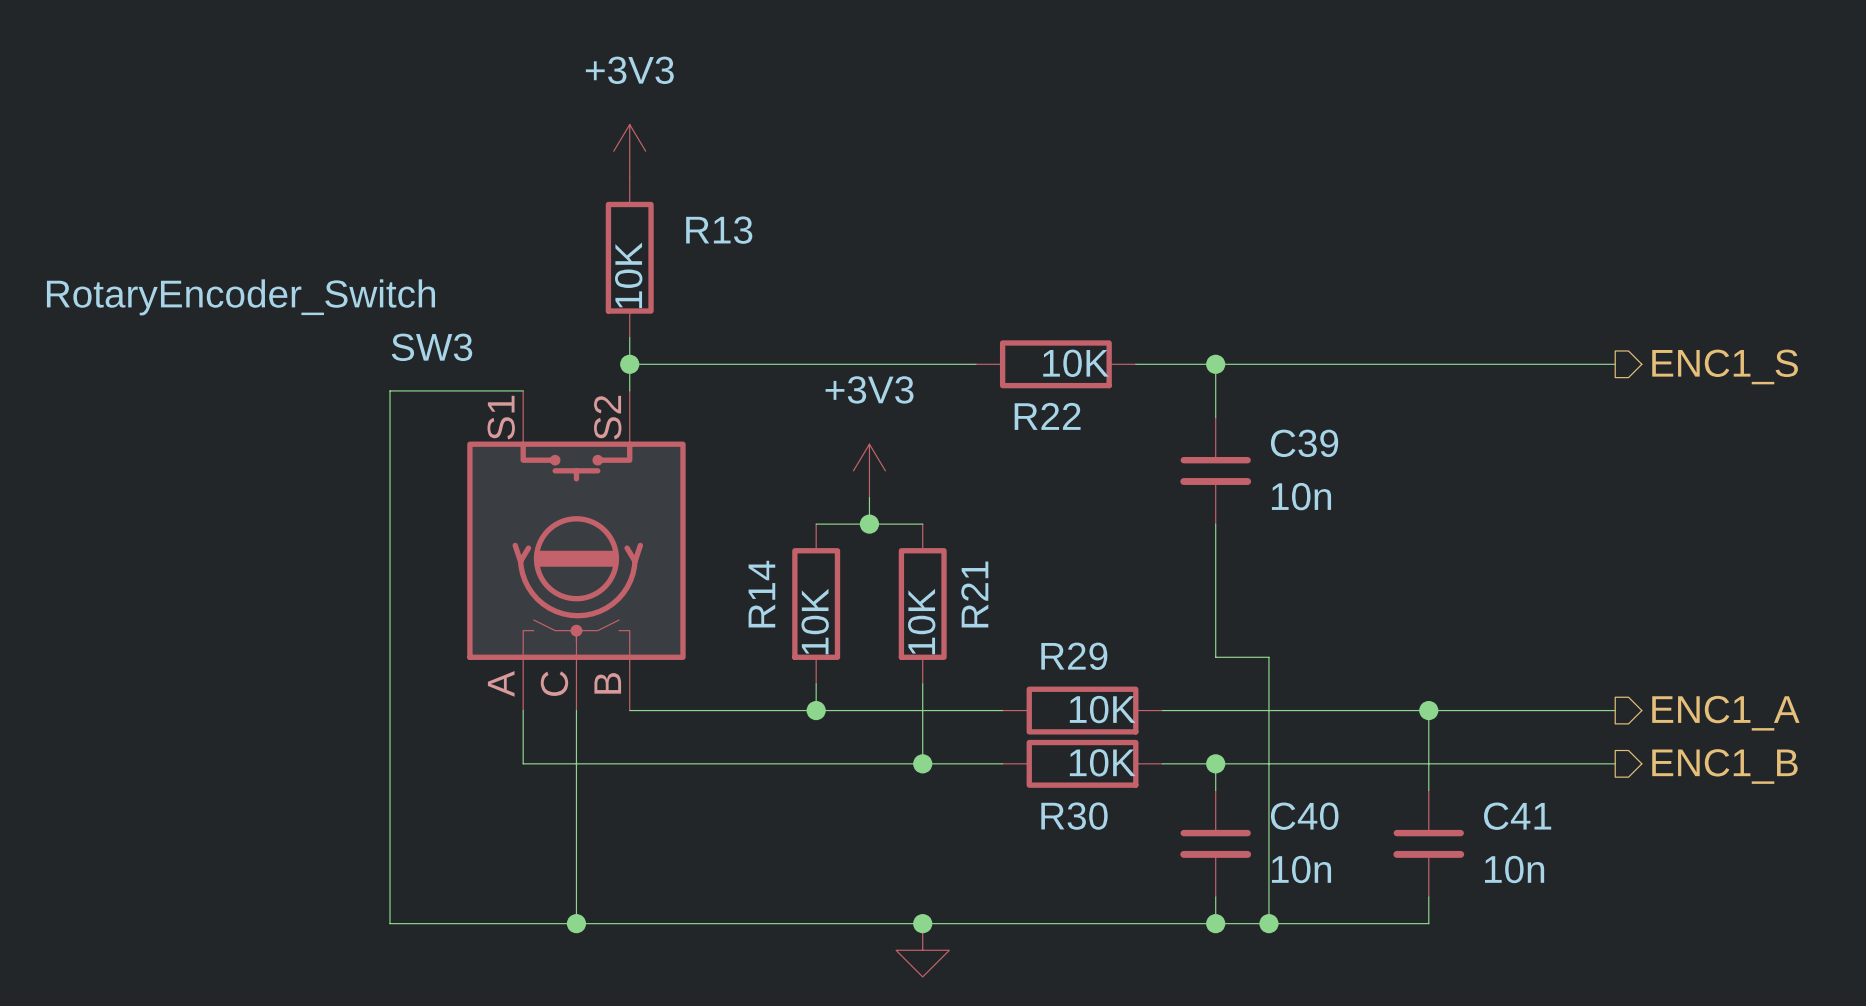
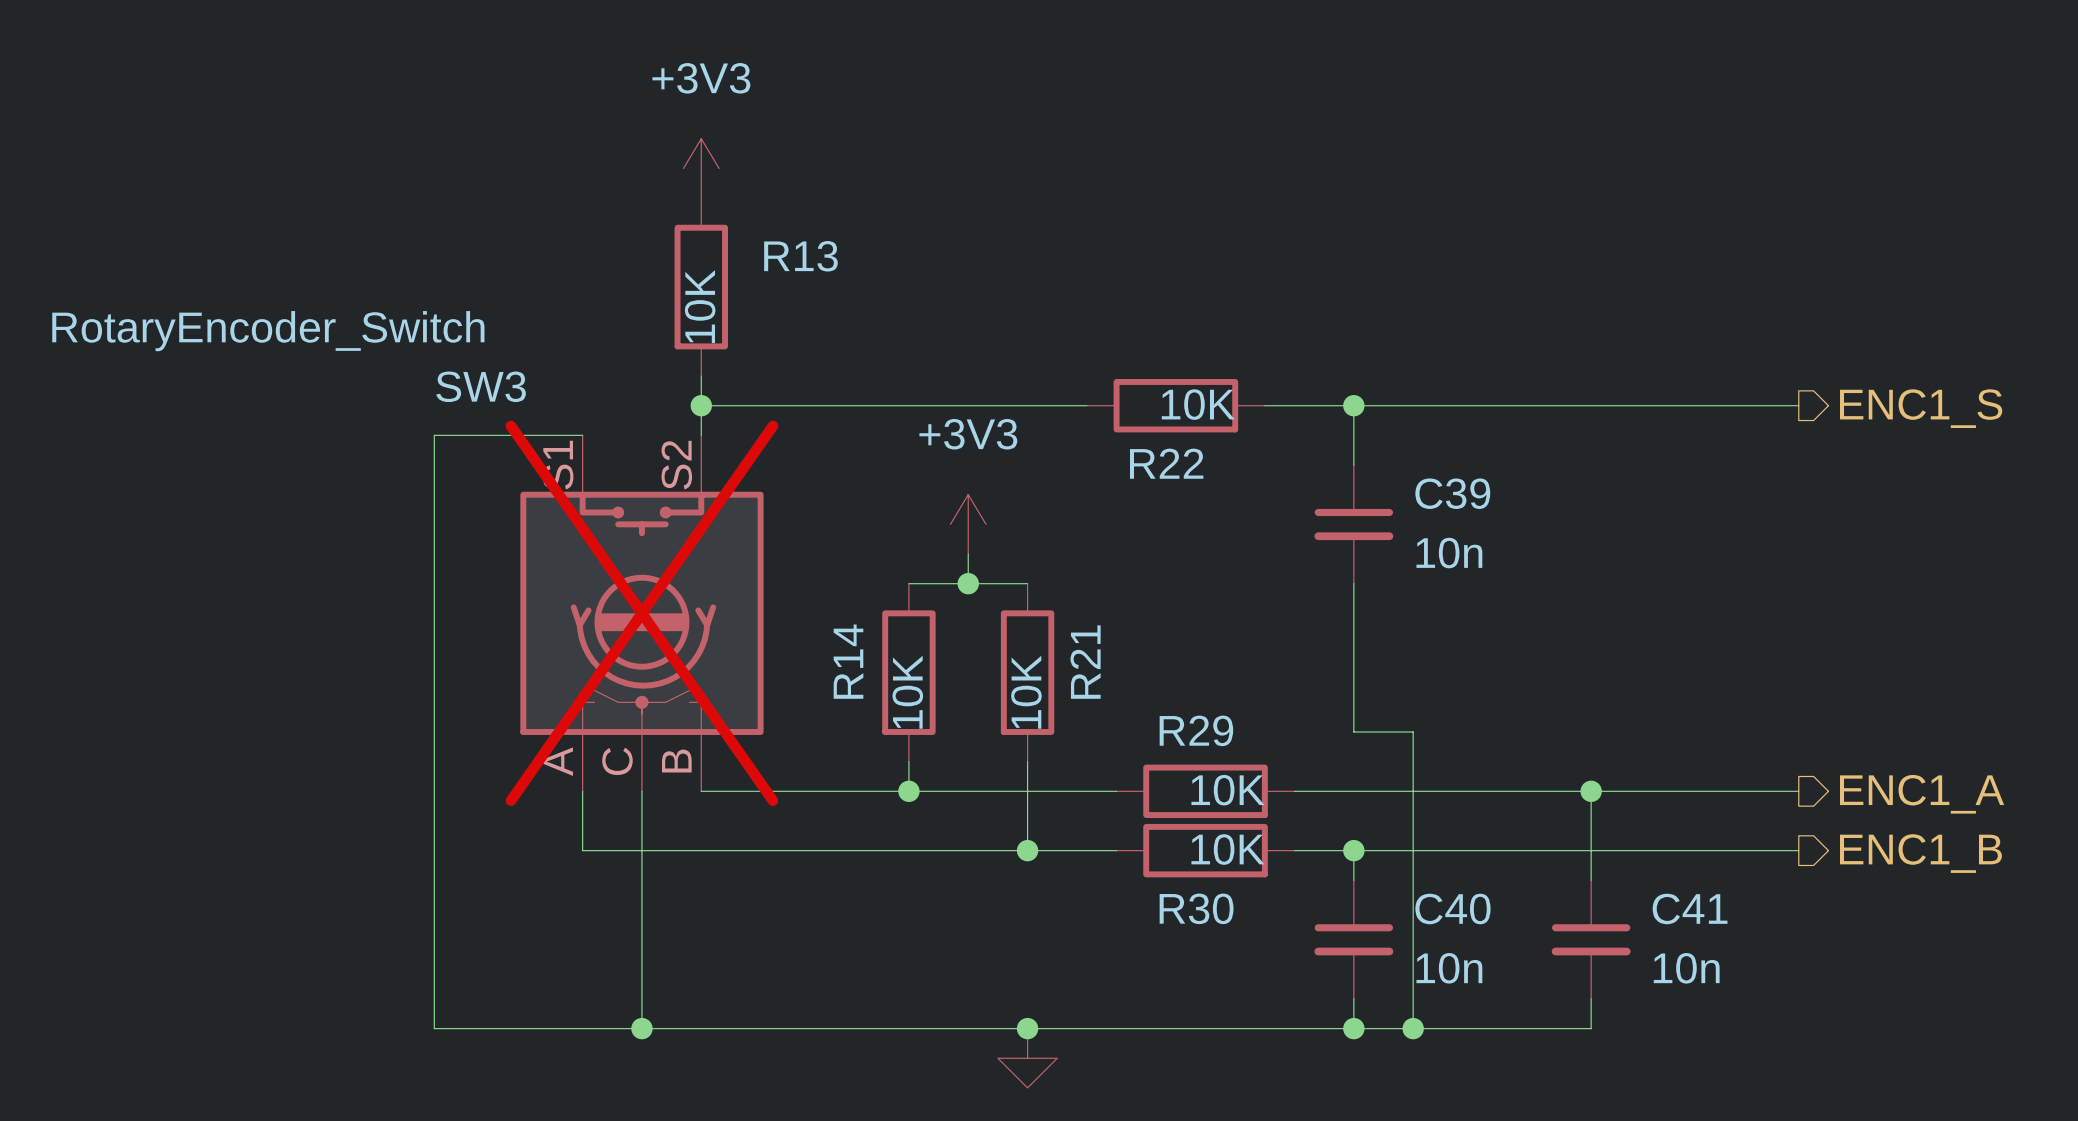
SW3 do-not-place cross: none -> (641, 613)

